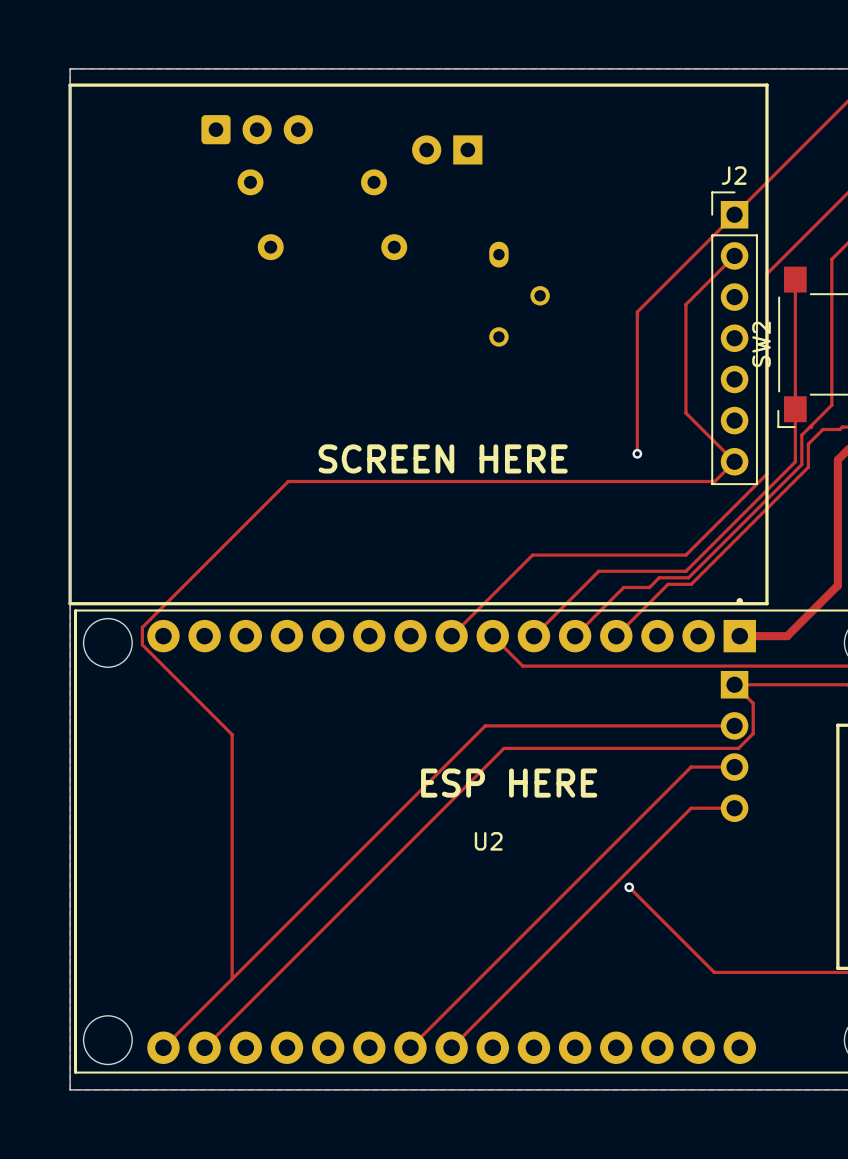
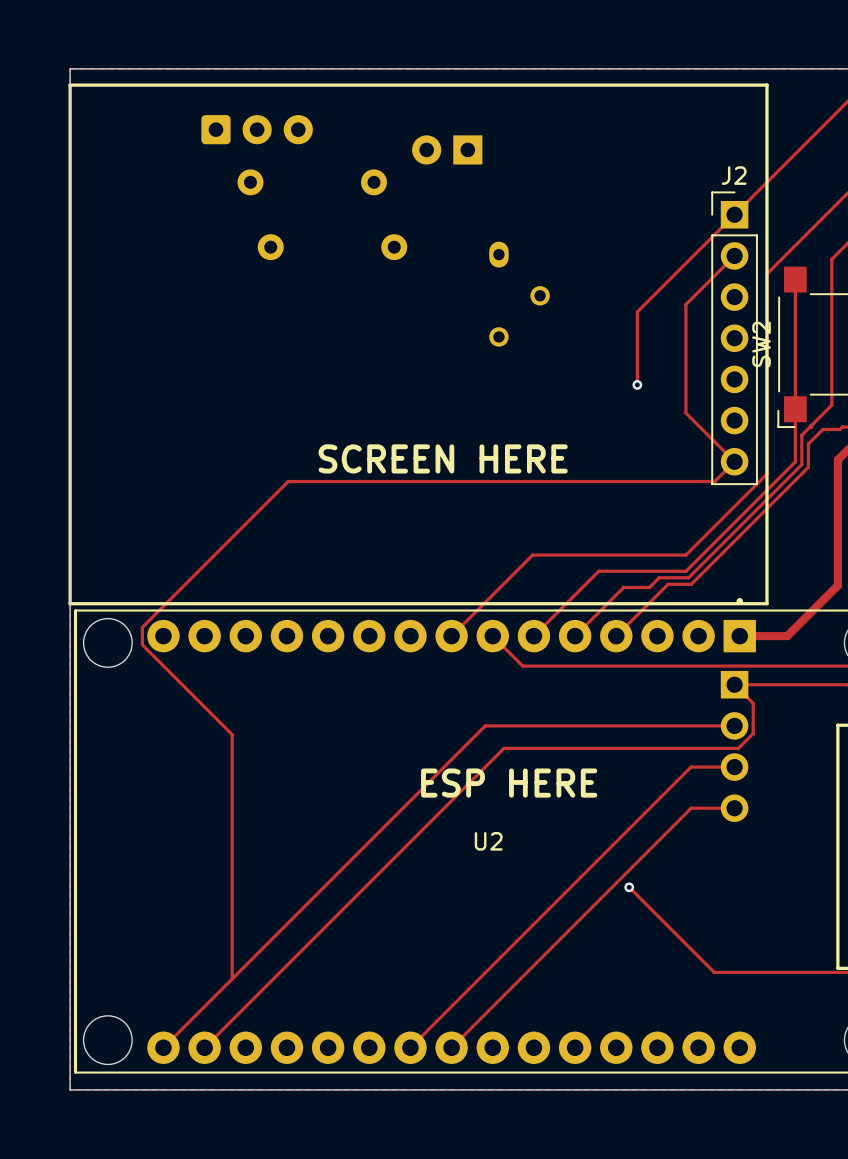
track: (637, 384) (637, 453) -> none
via position: (637, 453) -> (637, 384)

